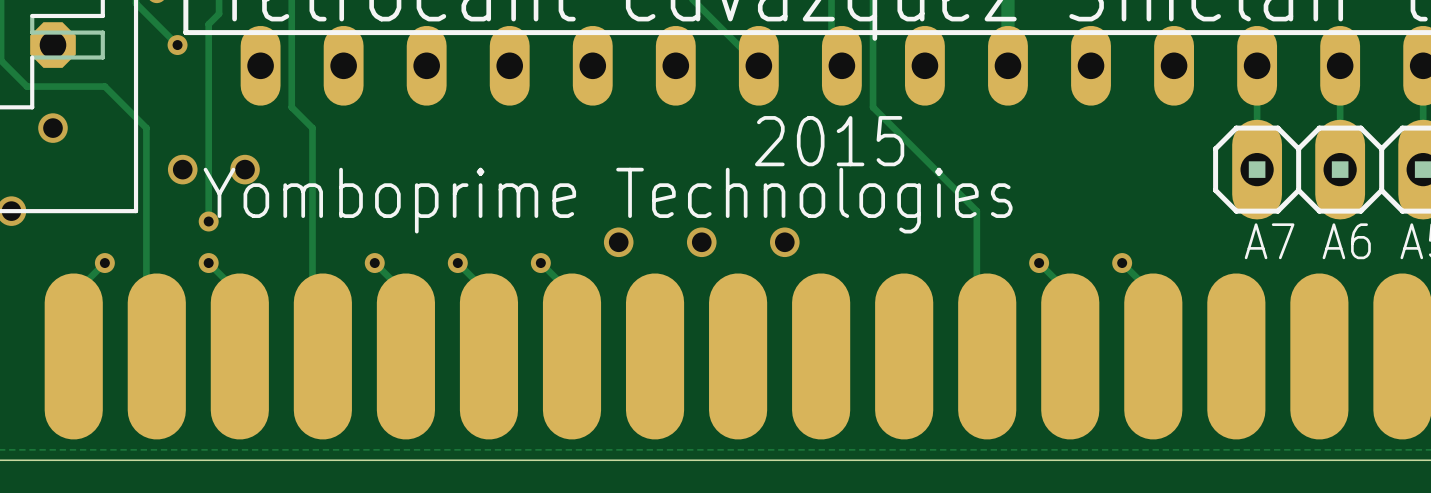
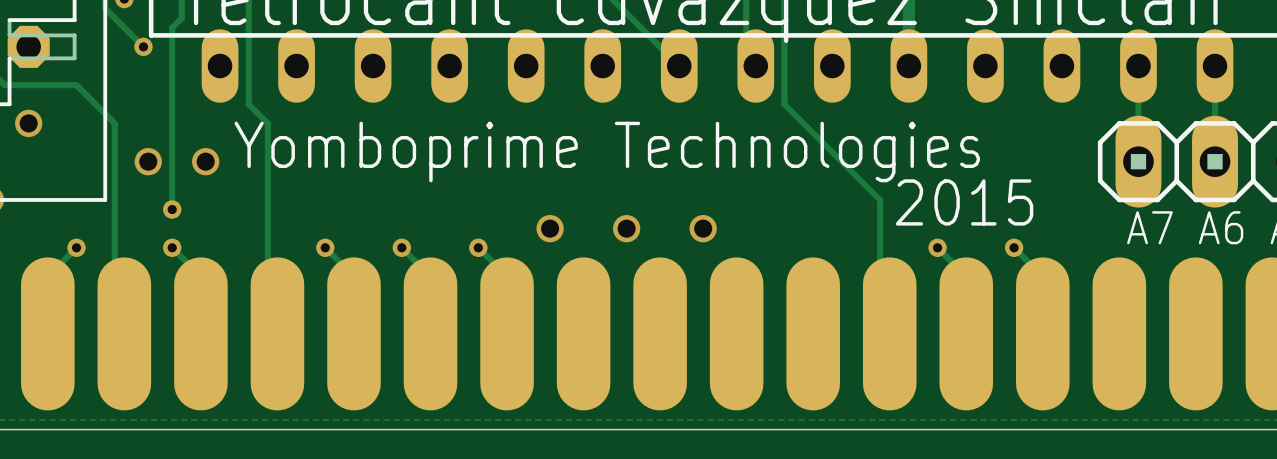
text position: 2015 (829, 141) -> 2015 (964, 202)
text position: Yomboprime Technologies (608, 200) -> Yomboprime Technologies (607, 152)

